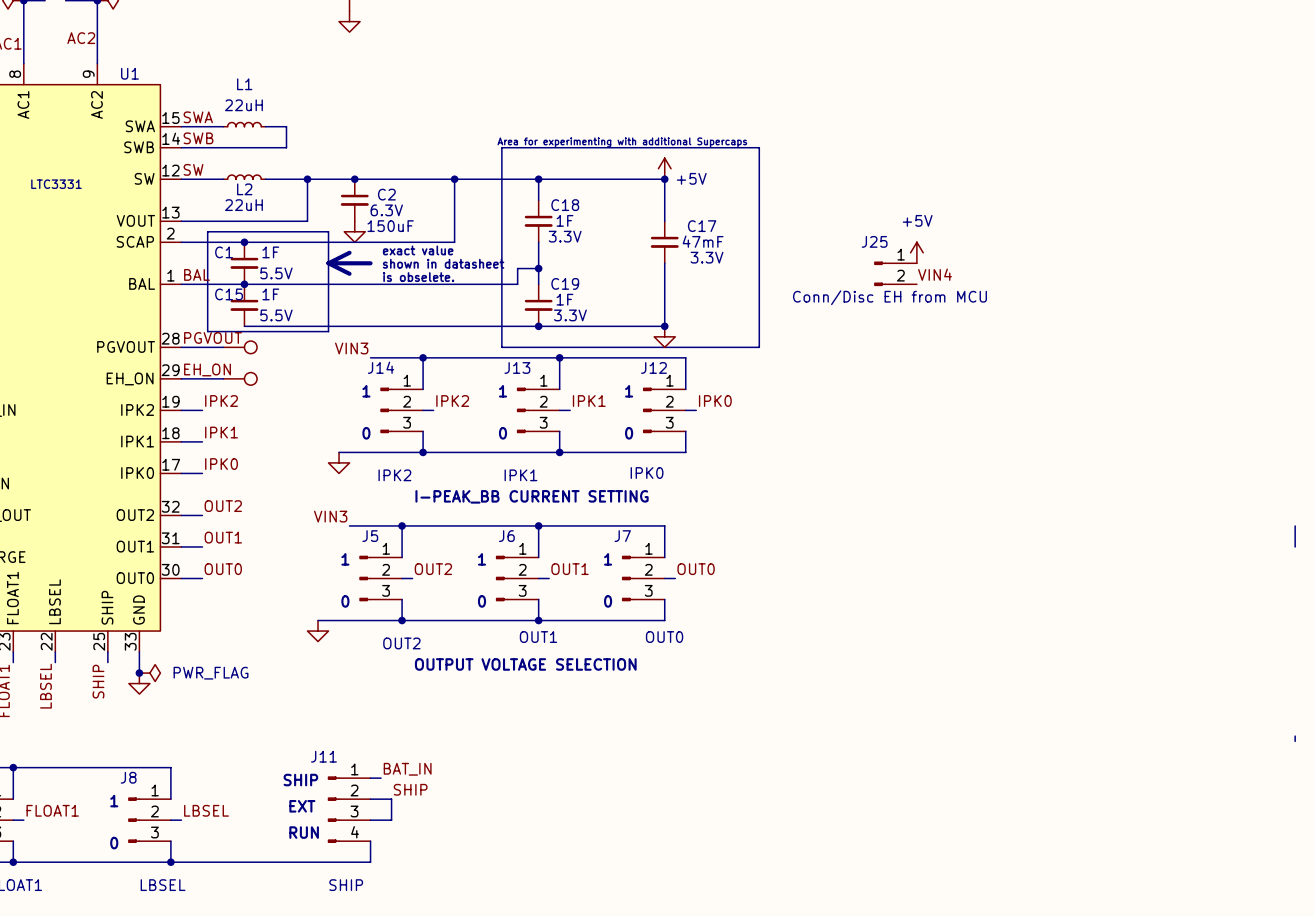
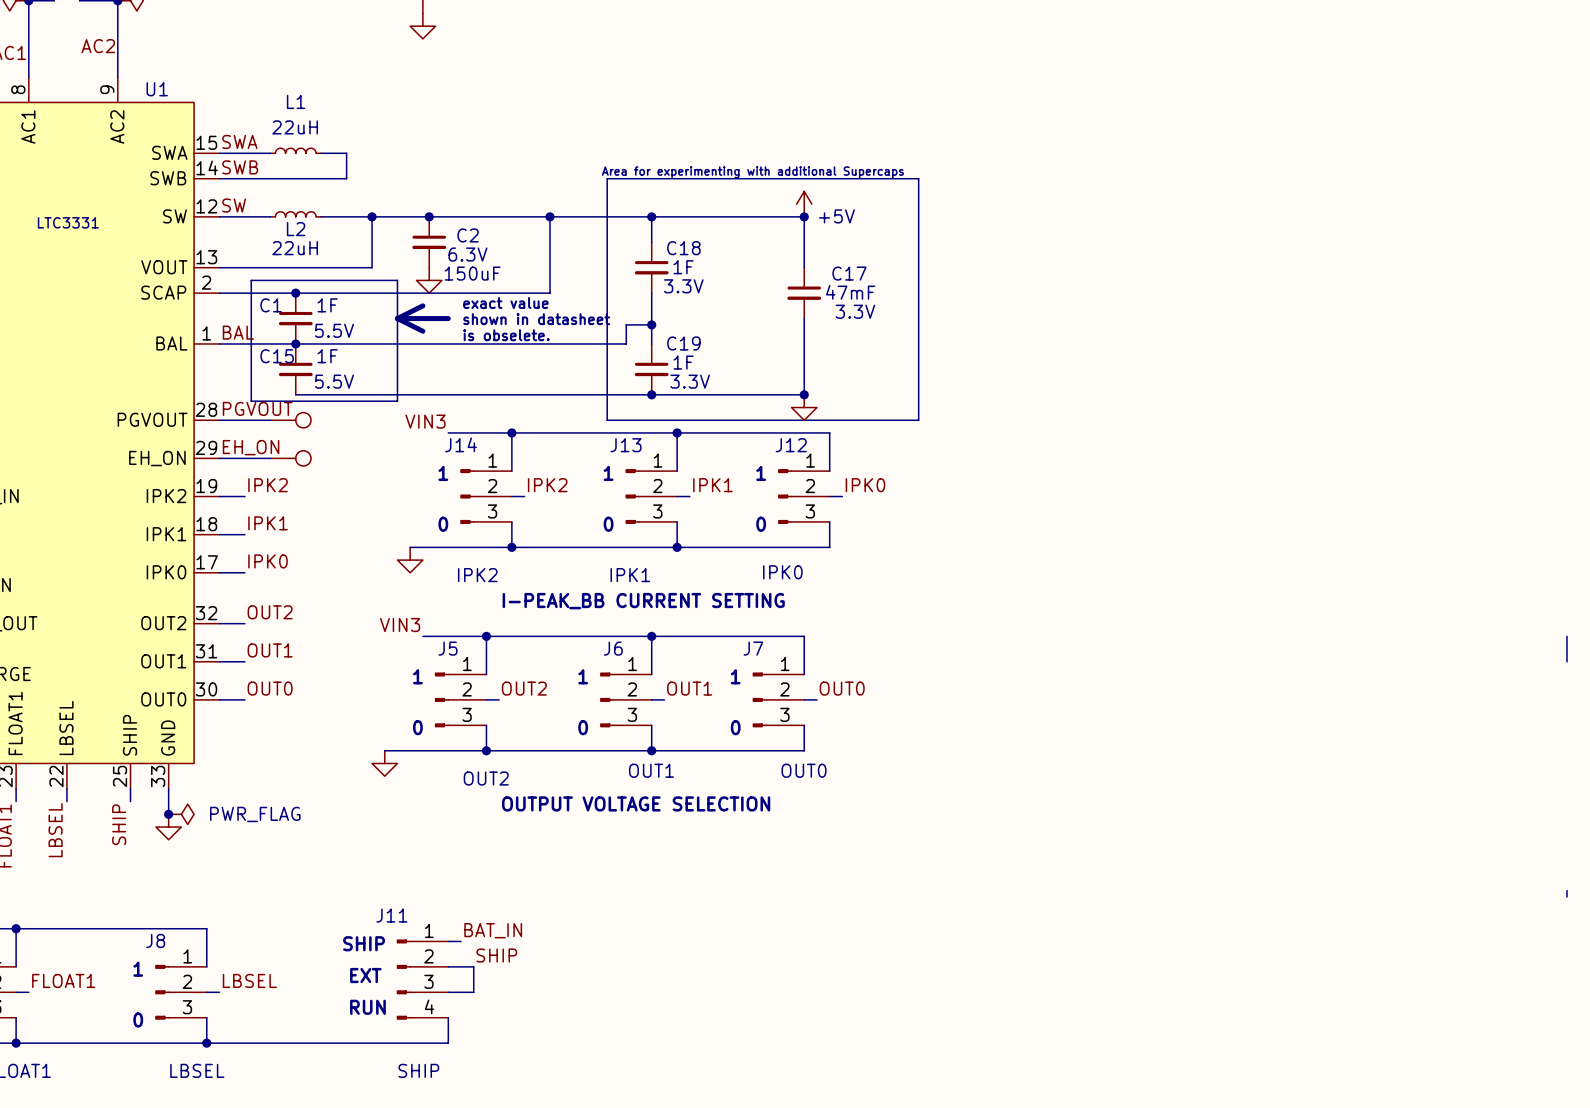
power symbol: +5V (916, 252) -> none
J25: (895, 273) -> none
label: VIN4 (934, 274) -> none
text: Conn/Disc EH from MCU (889, 297) -> none

